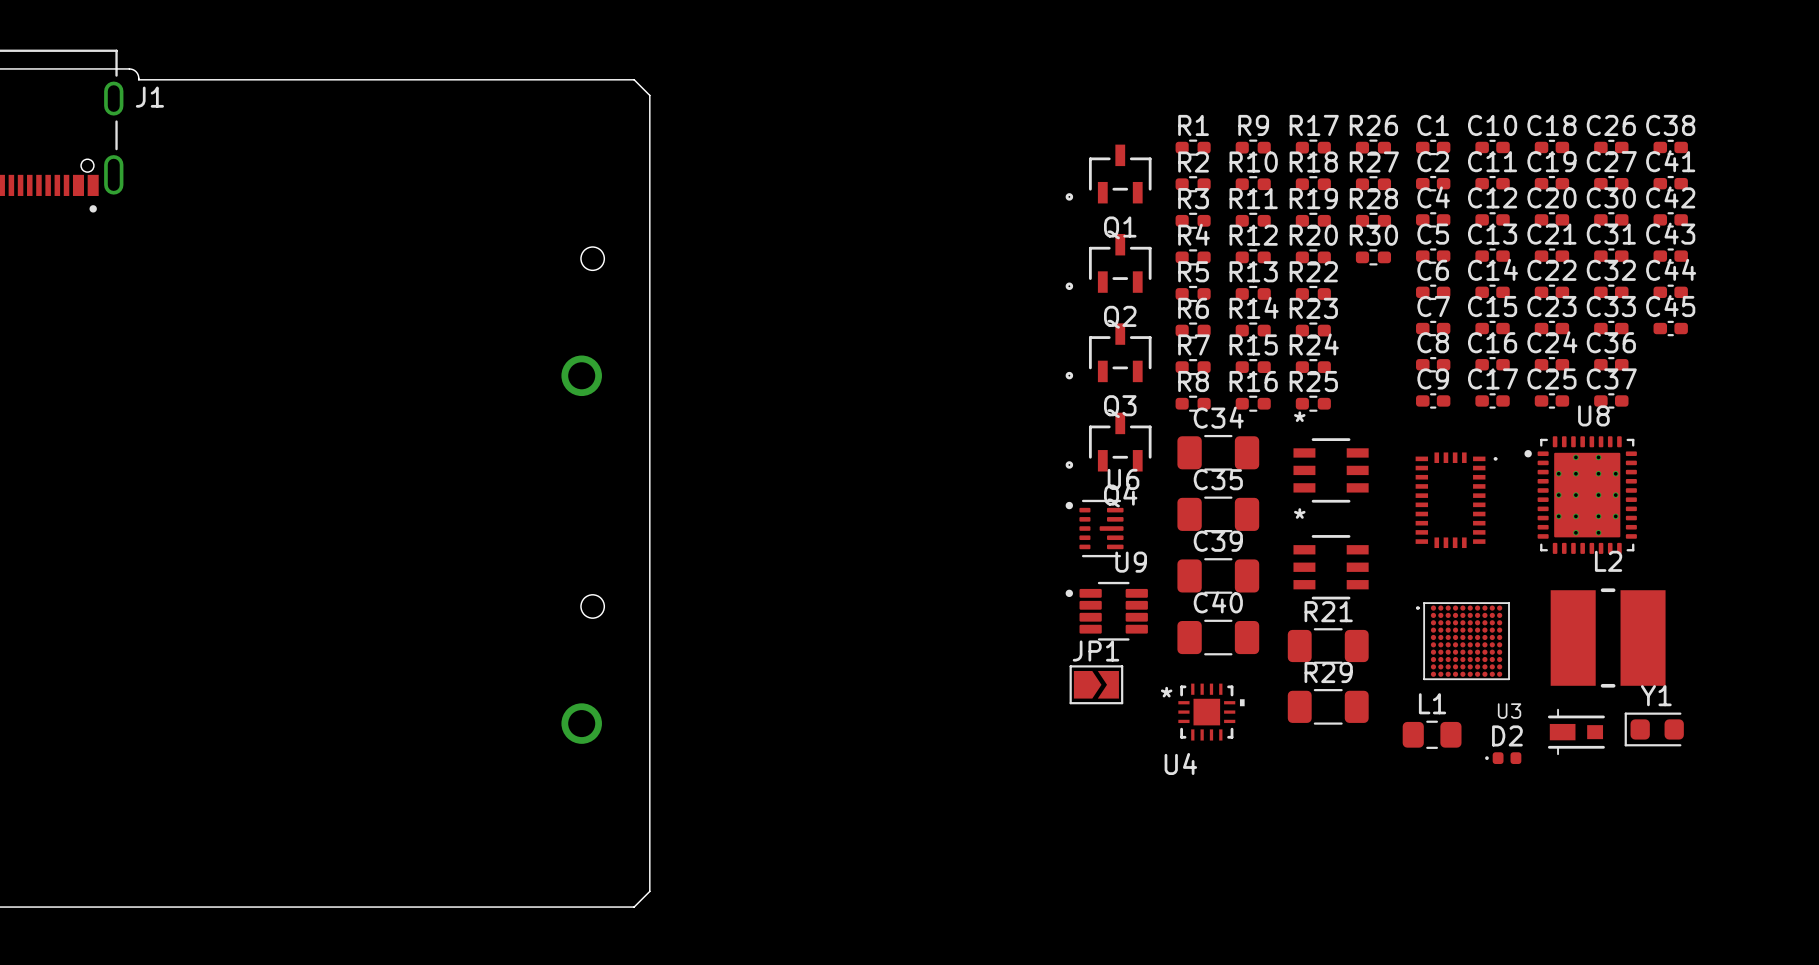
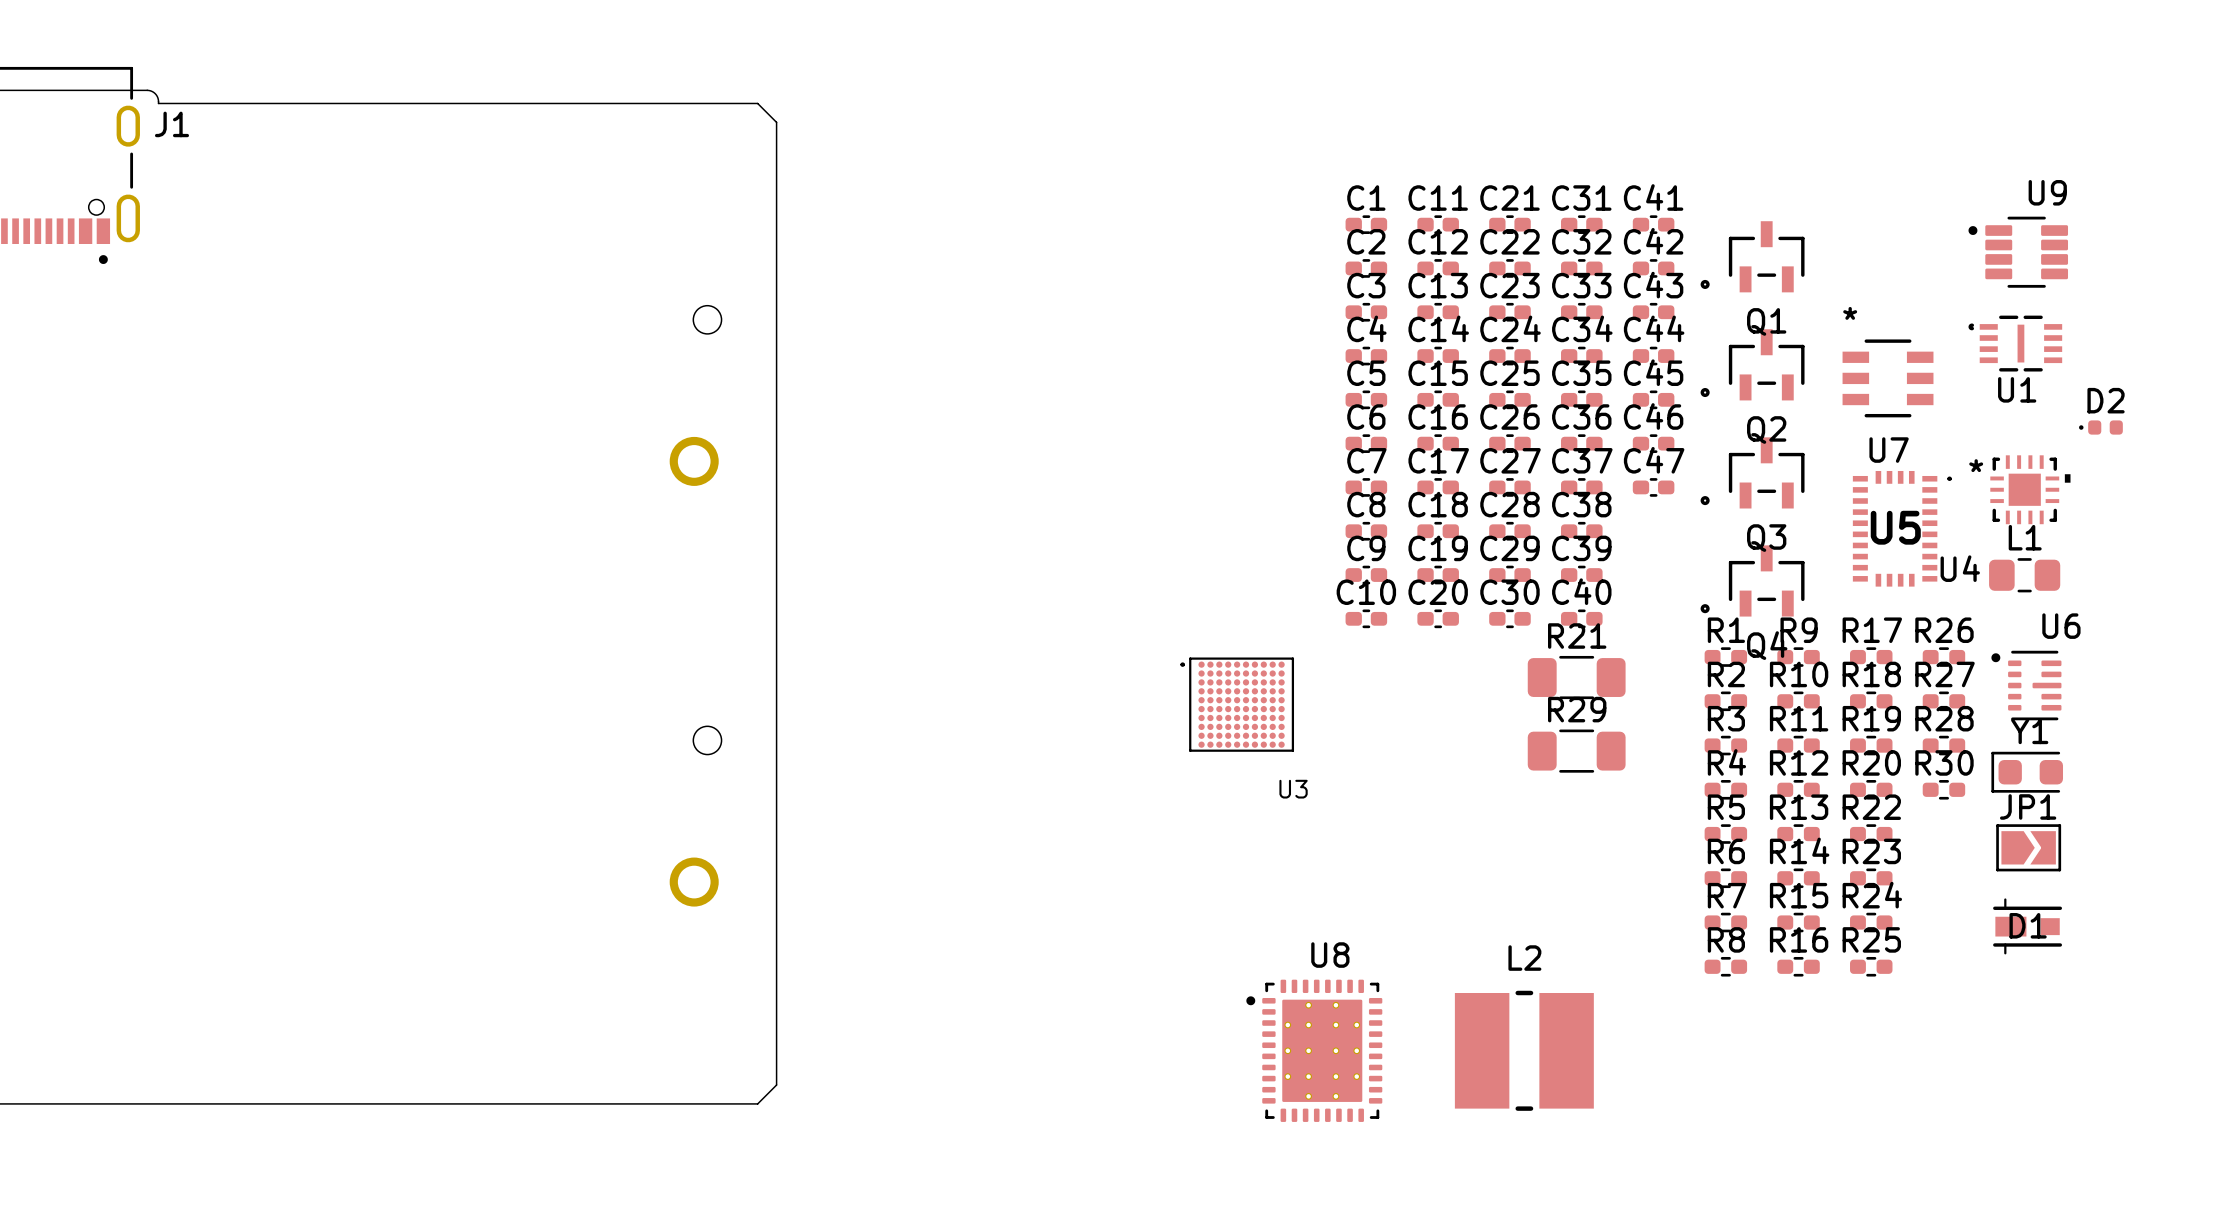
R1 position: (1193, 147) -> (1725, 657)
R9 position: (1253, 147) -> (1798, 657)
R17 position: (1313, 147) -> (1871, 657)
R26 position: (1373, 147) -> (1943, 657)
C1 position: (1433, 147) -> (1366, 224)
C10 position: (1492, 147) -> (1366, 618)
C18 position: (1551, 147) -> (1438, 531)
C26 position: (1611, 147) -> (1509, 443)
C38 position: (1670, 147) -> (1581, 531)
Q1 position: (1108, 174) -> (1752, 256)
C2 position: (1433, 183) -> (1366, 268)
C11 position: (1492, 183) -> (1438, 224)
C19 position: (1551, 183) -> (1438, 575)
C27 position: (1611, 183) -> (1509, 487)
C41 position: (1670, 183) -> (1653, 224)
R2 position: (1193, 184) -> (1725, 701)
R10 position: (1253, 184) -> (1798, 701)
R18 position: (1313, 184) -> (1871, 701)
R27 position: (1373, 184) -> (1943, 701)
C4 position: (1433, 219) -> (1366, 356)
C12 position: (1492, 219) -> (1438, 268)
C20 position: (1551, 219) -> (1438, 618)
C30 position: (1611, 219) -> (1509, 618)
C42 position: (1670, 219) -> (1653, 268)
R3 position: (1193, 220) -> (1725, 745)
R11 position: (1253, 220) -> (1798, 745)
R19 position: (1313, 220) -> (1871, 745)
R28 position: (1373, 220) -> (1943, 745)
C3: none -> (1366, 312)
C5 position: (1433, 256) -> (1366, 399)
C13 position: (1492, 256) -> (1438, 312)
C21 position: (1551, 256) -> (1509, 224)
C31 position: (1611, 256) -> (1581, 224)
C43 position: (1670, 256) -> (1653, 312)
R4 position: (1193, 257) -> (1725, 789)
R12 position: (1253, 257) -> (1798, 789)
R20 position: (1313, 257) -> (1871, 789)
R30 position: (1373, 257) -> (1943, 789)
Q2 position: (1108, 263) -> (1752, 364)
U1: none -> (2015, 343)
C6 position: (1433, 292) -> (1366, 443)
C14 position: (1492, 292) -> (1438, 356)
C22 position: (1551, 292) -> (1509, 268)
C32 position: (1611, 292) -> (1581, 268)
C44 position: (1670, 292) -> (1653, 356)
R5 position: (1193, 293) -> (1725, 834)
R13 position: (1253, 293) -> (1798, 834)
R22 position: (1313, 293) -> (1871, 834)
U7: none -> (1888, 378)
C7 position: (1433, 328) -> (1366, 487)
C15 position: (1492, 328) -> (1438, 399)
C23 position: (1551, 328) -> (1509, 312)
C33 position: (1611, 328) -> (1581, 312)
C45 position: (1670, 328) -> (1653, 399)
R6 position: (1193, 330) -> (1725, 878)
R14 position: (1253, 330) -> (1798, 878)
R23 position: (1313, 330) -> (1871, 878)
Q3 position: (1108, 352) -> (1752, 472)
C46: none -> (1653, 443)
C8 position: (1433, 364) -> (1366, 531)
C16 position: (1492, 364) -> (1438, 443)
C24 position: (1551, 364) -> (1509, 356)
C36 position: (1611, 364) -> (1581, 443)
R7 position: (1193, 367) -> (1725, 922)
R15 position: (1253, 367) -> (1798, 922)
R24 position: (1313, 367) -> (1871, 922)
C47: none -> (1653, 487)
C9 position: (1433, 400) -> (1366, 575)
C17 position: (1492, 400) -> (1438, 487)
C25 position: (1551, 400) -> (1509, 399)
C37 position: (1611, 400) -> (1581, 487)
R8 position: (1193, 403) -> (1725, 966)
R16 position: (1253, 403) -> (1798, 966)
R25 position: (1313, 403) -> (1871, 966)
U5: none -> (1902, 528)
C28: none -> (1509, 531)
C34 footprint: [1177, 434, 1260, 471] -> [1560, 346, 1603, 366]
Q4 position: (1108, 442) -> (1752, 580)
C29: none -> (1509, 575)
part: (1331, 470) -> none
U8 position: (1580, 495) -> (1314, 1050)
C35 footprint: [1177, 496, 1260, 533] -> [1560, 390, 1603, 410]
part: (1456, 500) -> none
U6 position: (1094, 528) -> (2026, 685)
C39 footprint: [1177, 558, 1260, 594] -> [1560, 565, 1603, 585]
part: (1331, 567) -> none
U9 position: (1106, 611) -> (2018, 252)
C40 footprint: [1177, 619, 1260, 656] -> [1560, 609, 1603, 629]
L2 position: (1608, 638) -> (1524, 1050)
U3 position: (1462, 641) -> (1237, 704)
R21 position: (1328, 646) -> (1576, 677)
JP1 position: (1096, 684) -> (2028, 847)
R29 position: (1328, 706) -> (1576, 751)
U4 position: (1211, 712) -> (2030, 489)
Y1 position: (1654, 729) -> (2027, 772)
part: (1576, 731) -> none
L1 position: (1432, 734) -> (2024, 575)
D2 position: (1503, 758) -> (2100, 427)
D1: none -> (2027, 926)
U4 name position: U4 (1180, 763) -> U4 (1960, 568)

